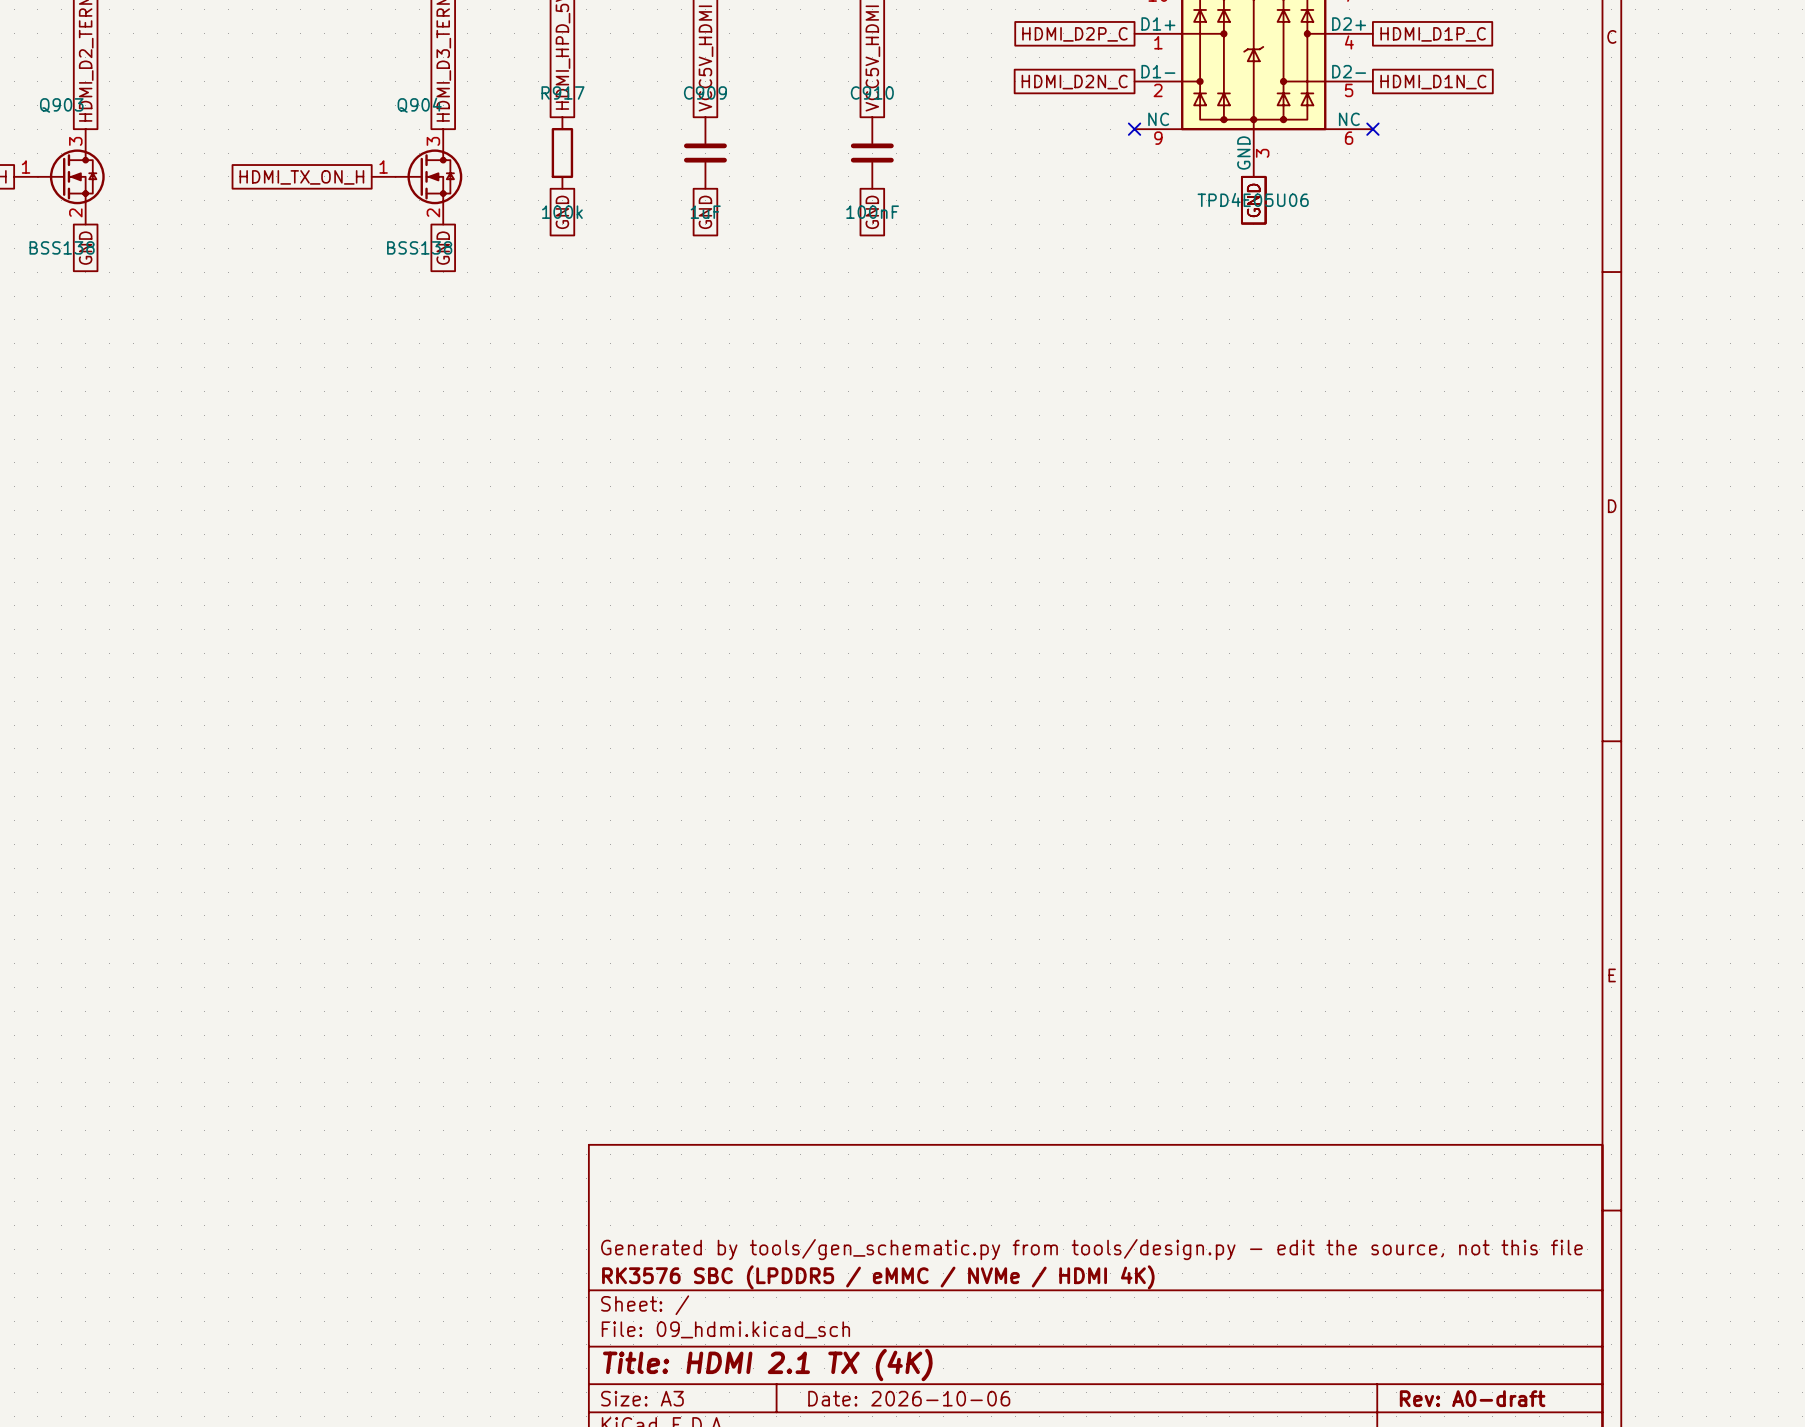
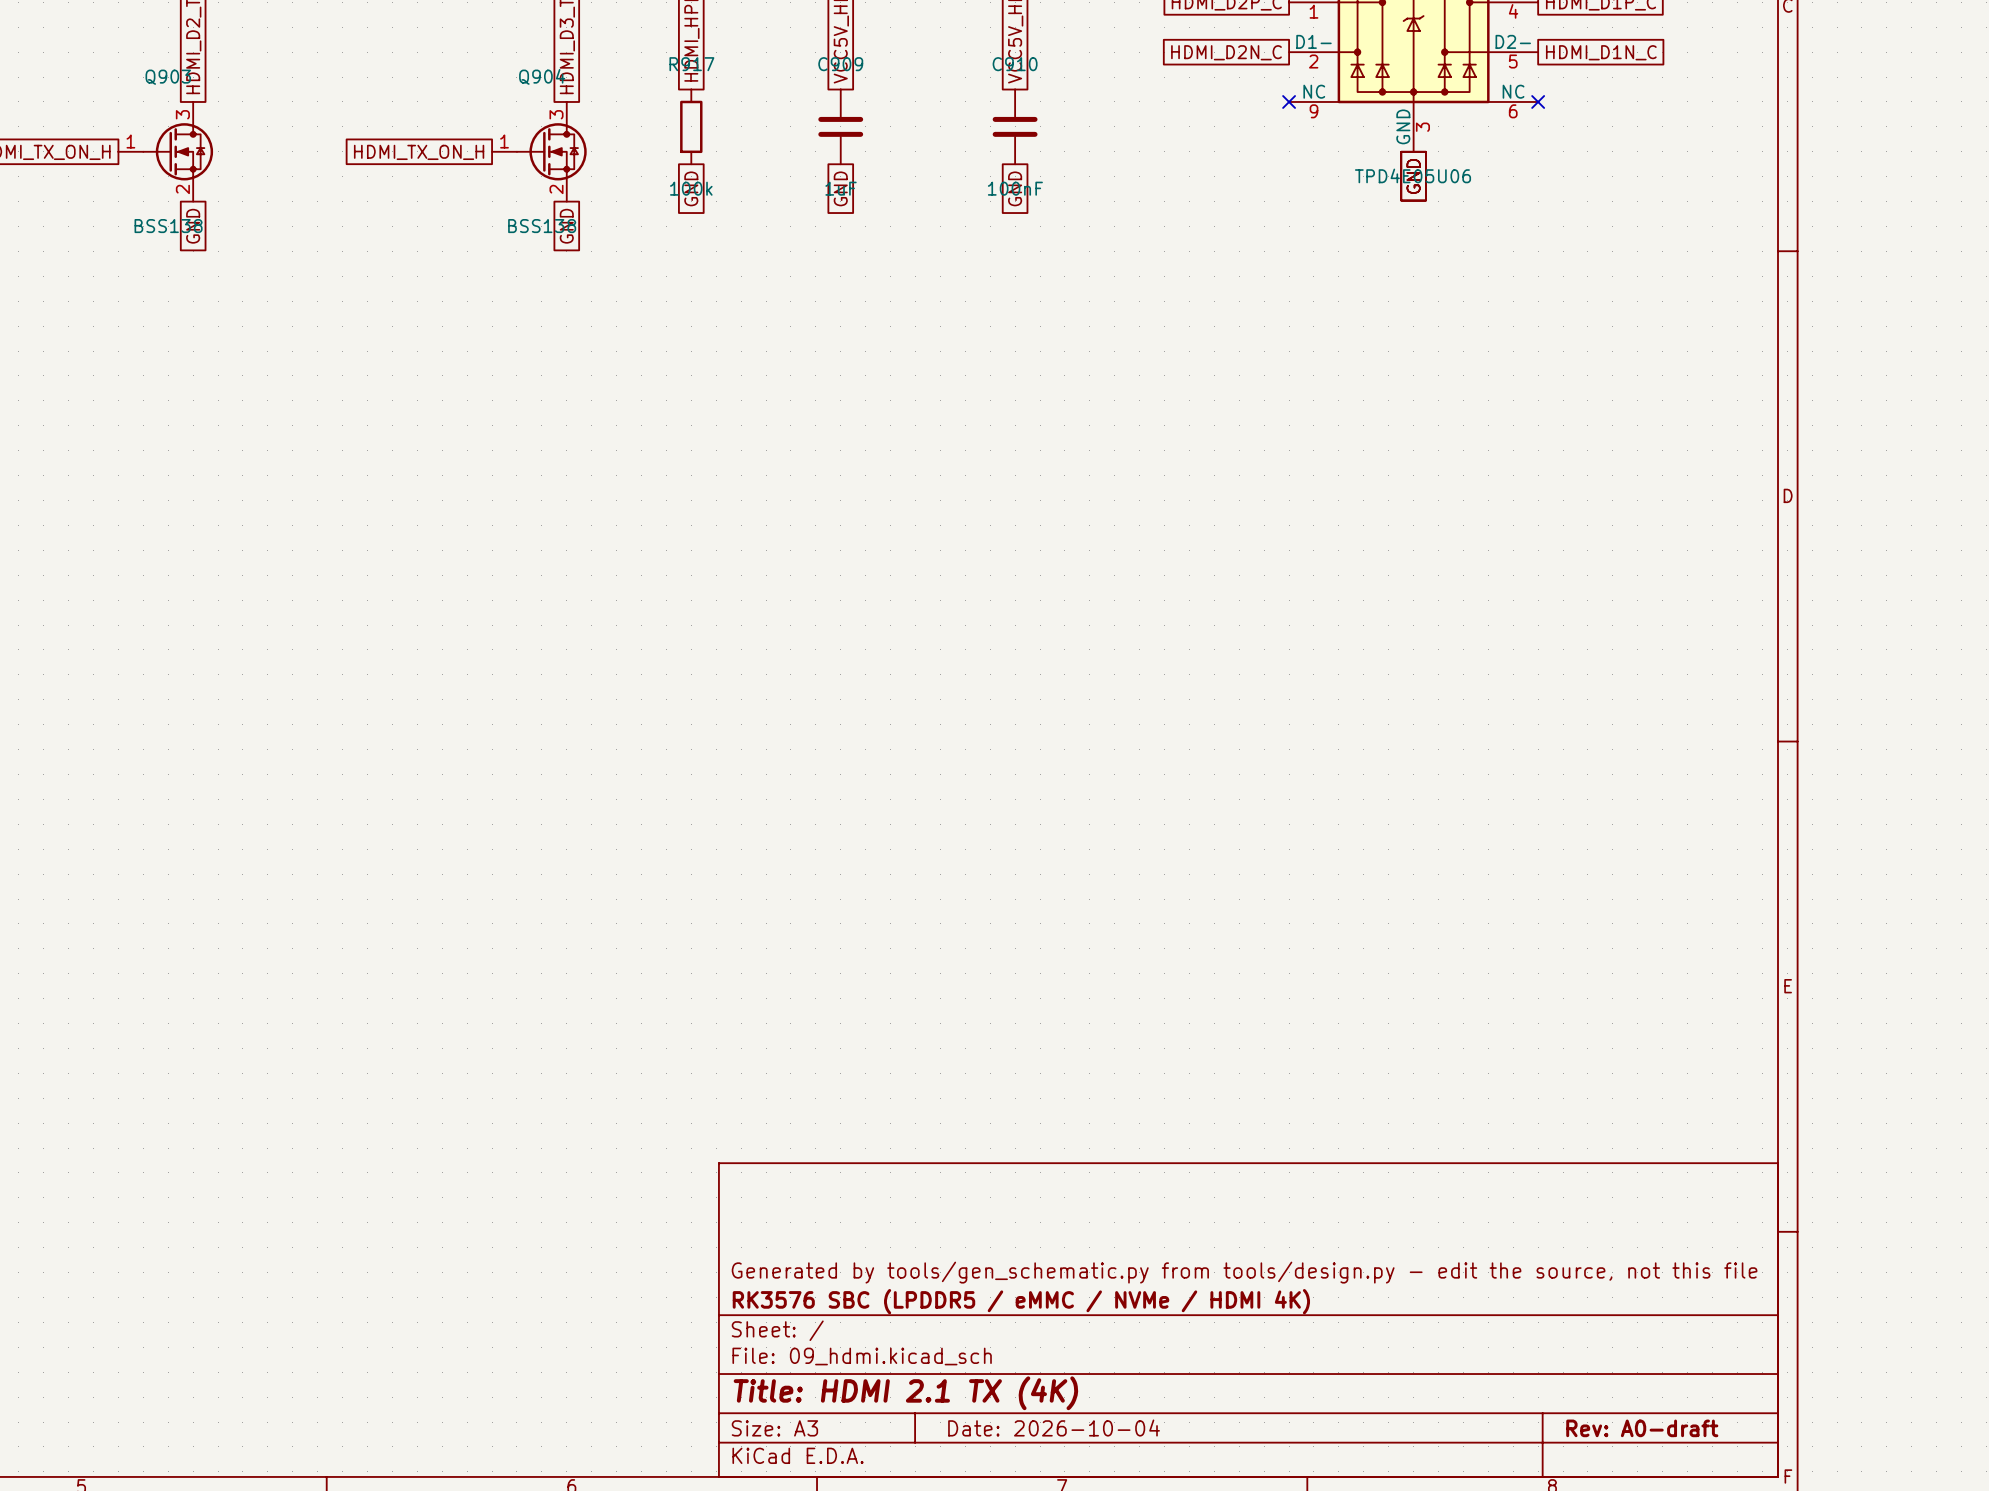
title block: Date: 2026-10-06 (909, 1398) -> Date: 2026-10-04 (1054, 1428)

